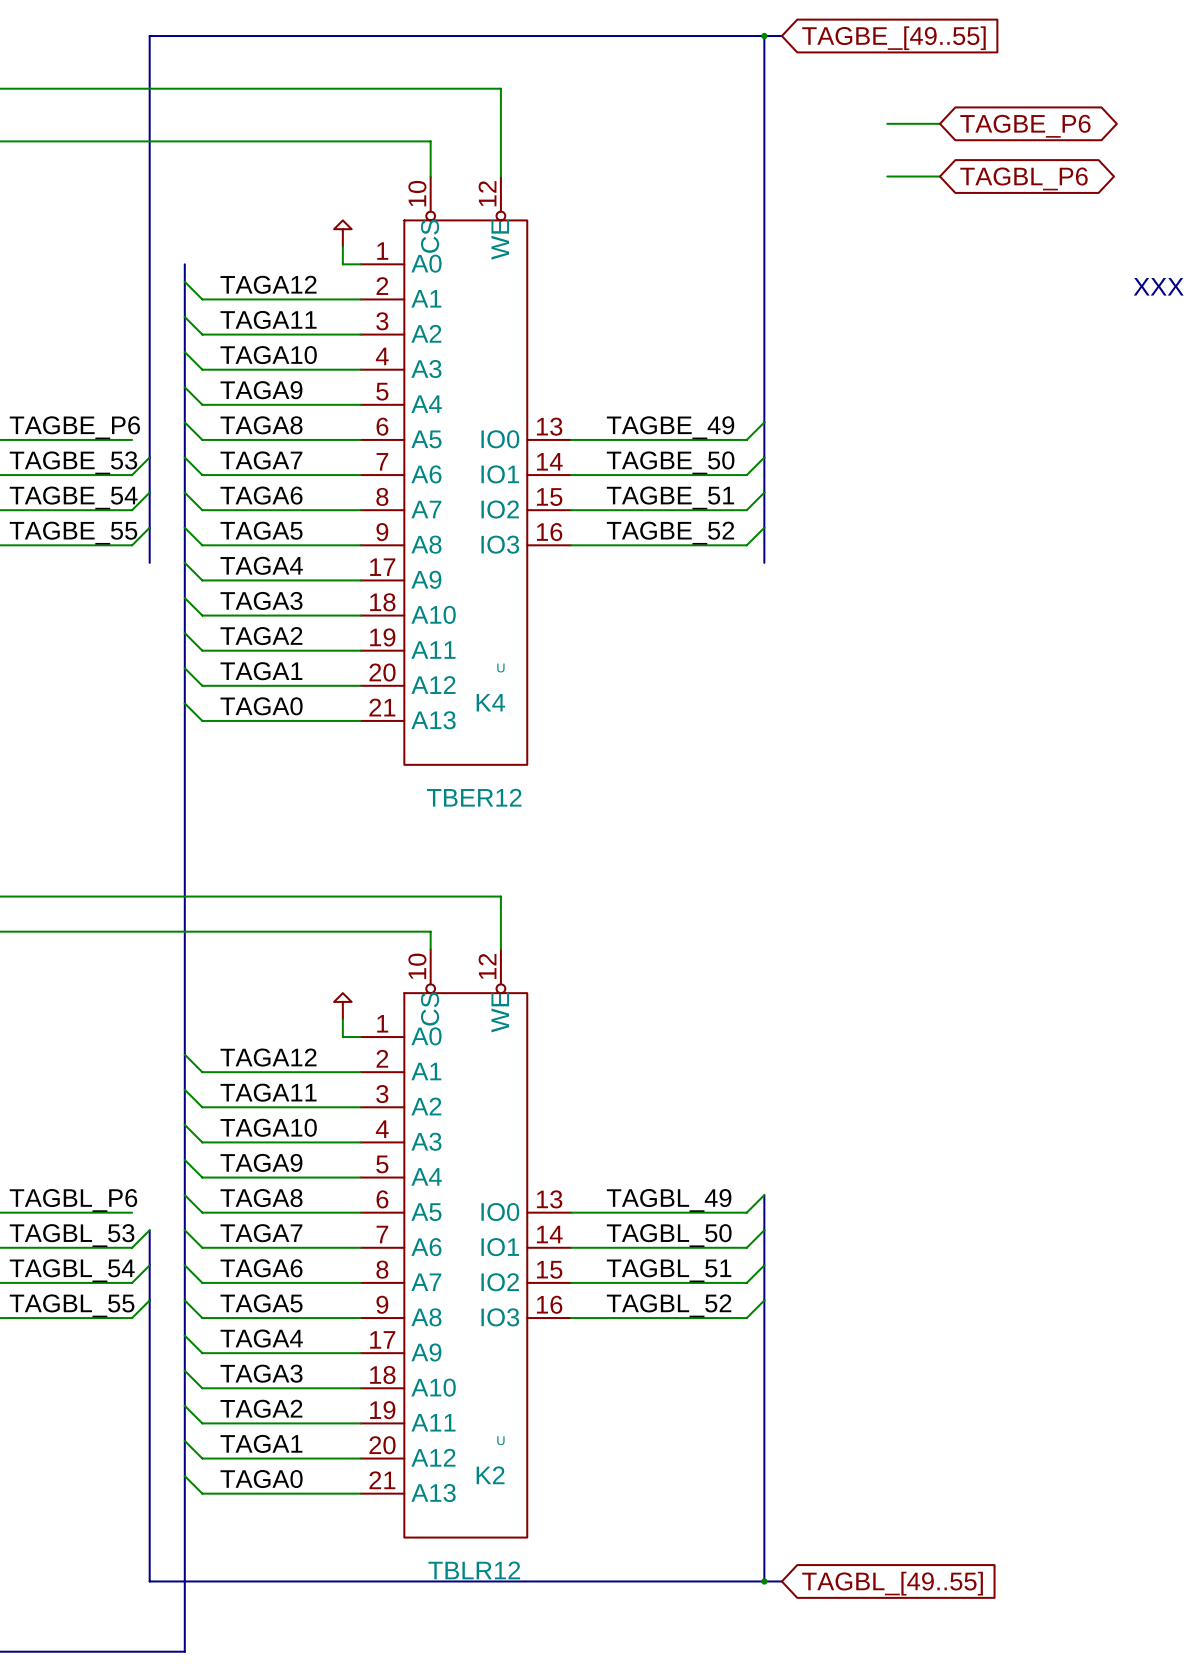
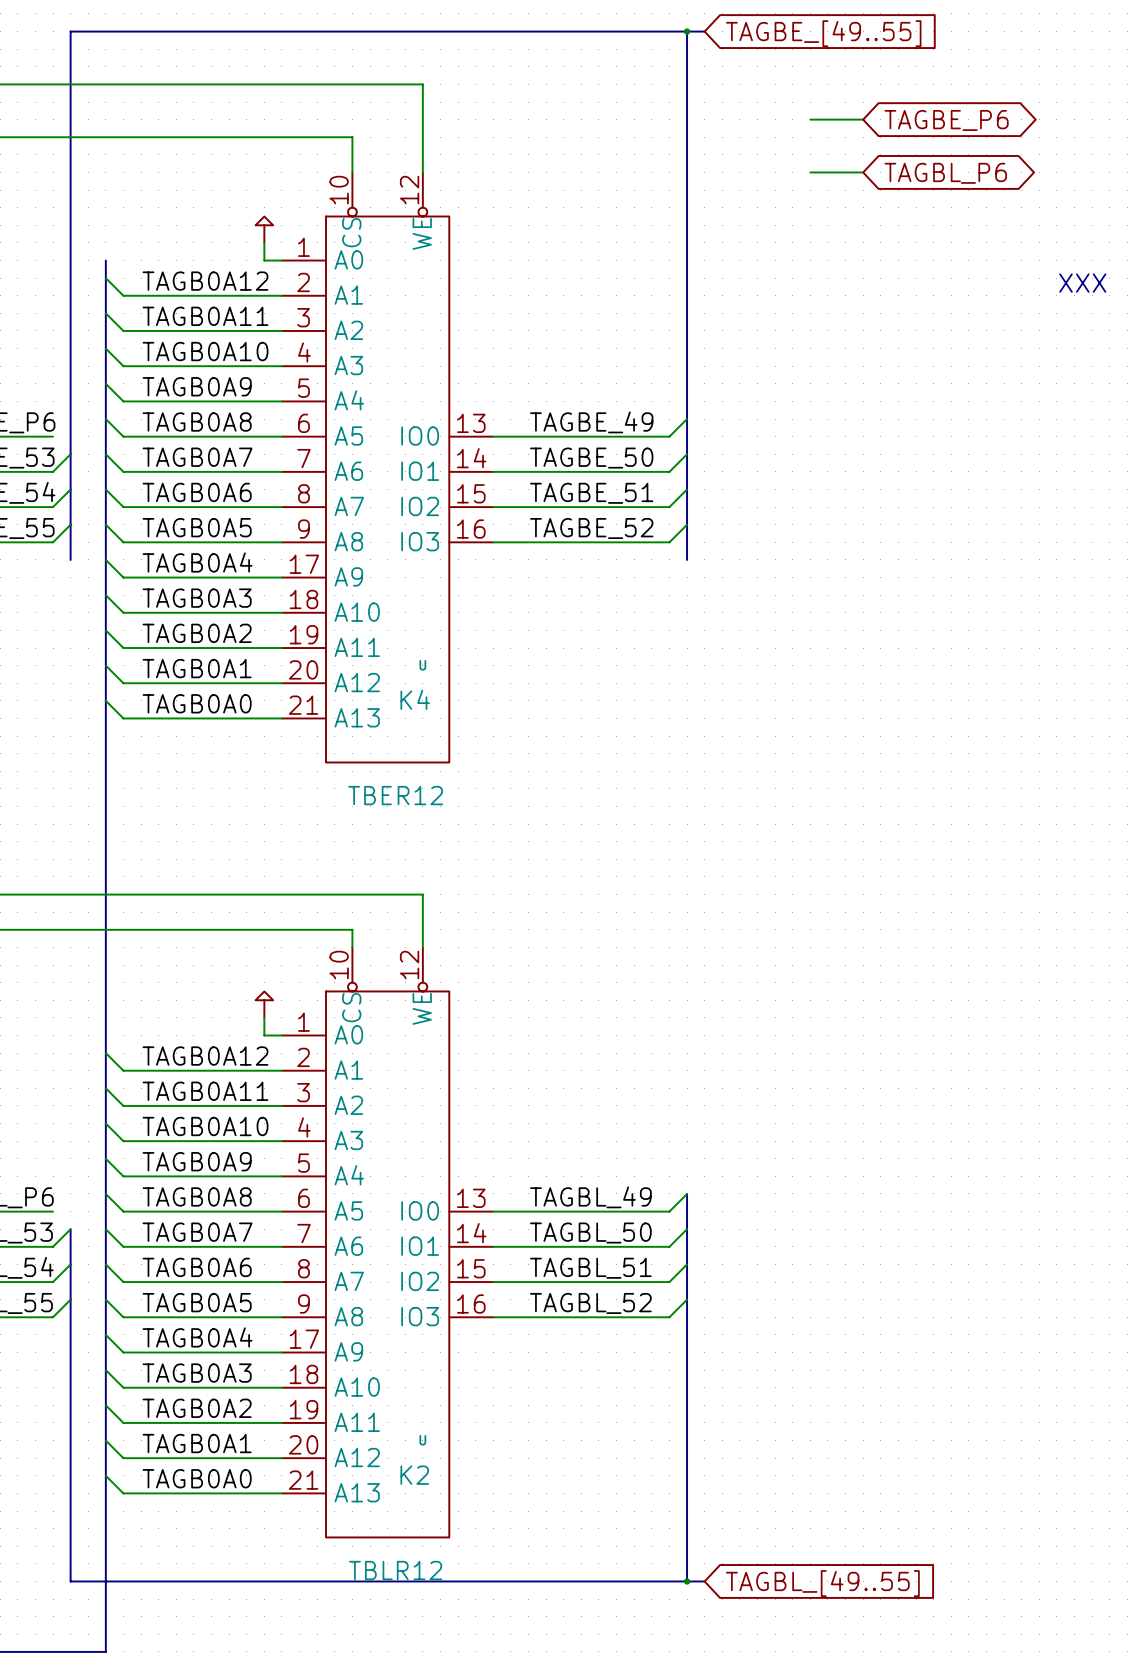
label: TAGA12 (268, 284) -> TAGB0A12 (205, 281)
label: TAGA11 (268, 319) -> TAGB0A11 (205, 316)
label: TAGA10 (268, 355) -> TAGB0A10 (205, 351)
label: TAGA9 (261, 390) -> TAGB0A9 (197, 386)
label: TAGA8 (261, 425) -> TAGB0A8 (197, 422)
label: TAGA7 (261, 460) -> TAGB0A7 (197, 457)
label: TAGA6 (261, 495) -> TAGB0A6 (197, 492)
label: TAGA5 (261, 530) -> TAGB0A5 (197, 527)
label: TAGA4 (261, 565) -> TAGB0A4 (197, 562)
label: TAGA3 (261, 600) -> TAGB0A3 (197, 598)
label: TAGA2 (261, 636) -> TAGB0A2 (197, 633)
label: TAGA1 (261, 671) -> TAGB0A1 (197, 668)
label: TAGA0 (261, 706) -> TAGB0A0 (197, 703)
label: TAGA12 (268, 1057) -> TAGB0A12 (205, 1056)
label: TAGA11 (268, 1092) -> TAGB0A11 (205, 1091)
label: TAGA10 (268, 1127) -> TAGB0A10 (205, 1126)
label: TAGA9 (261, 1162) -> TAGB0A9 (197, 1161)
label: TAGA8 (261, 1198) -> TAGB0A8 (197, 1196)
label: TAGA7 (261, 1233) -> TAGB0A7 (197, 1232)
label: TAGA6 (261, 1268) -> TAGB0A6 (197, 1267)
label: TAGA5 (261, 1303) -> TAGB0A5 (197, 1302)
label: TAGA4 (261, 1338) -> TAGB0A4 (197, 1337)
label: TAGA3 (261, 1373) -> TAGB0A3 (197, 1373)
label: TAGA2 (261, 1408) -> TAGB0A2 (197, 1408)
label: TAGA1 (261, 1443) -> TAGB0A1 (197, 1443)
label: TAGA0 (261, 1479) -> TAGB0A0 (197, 1478)

